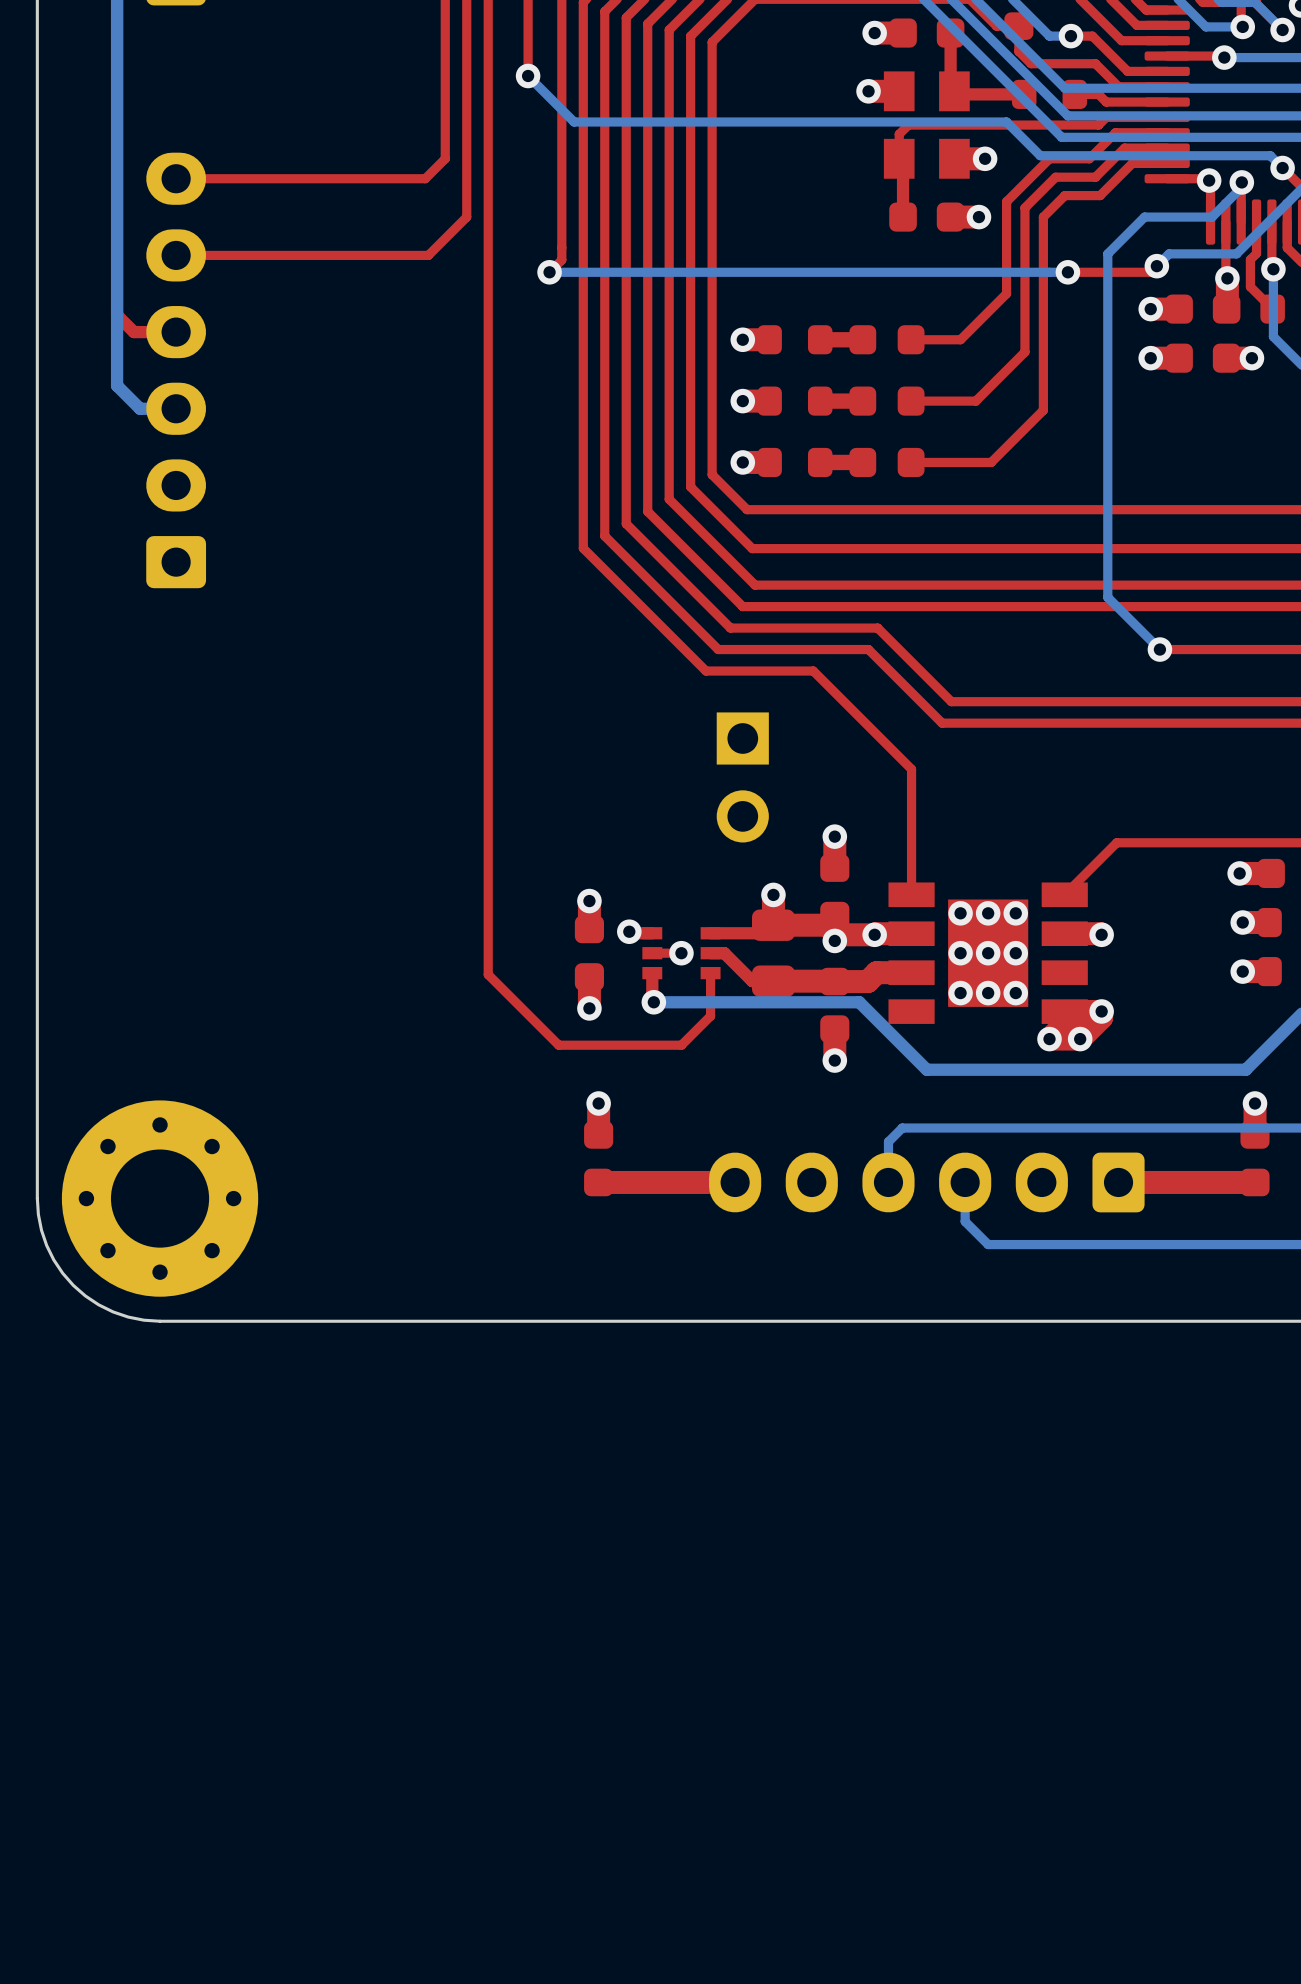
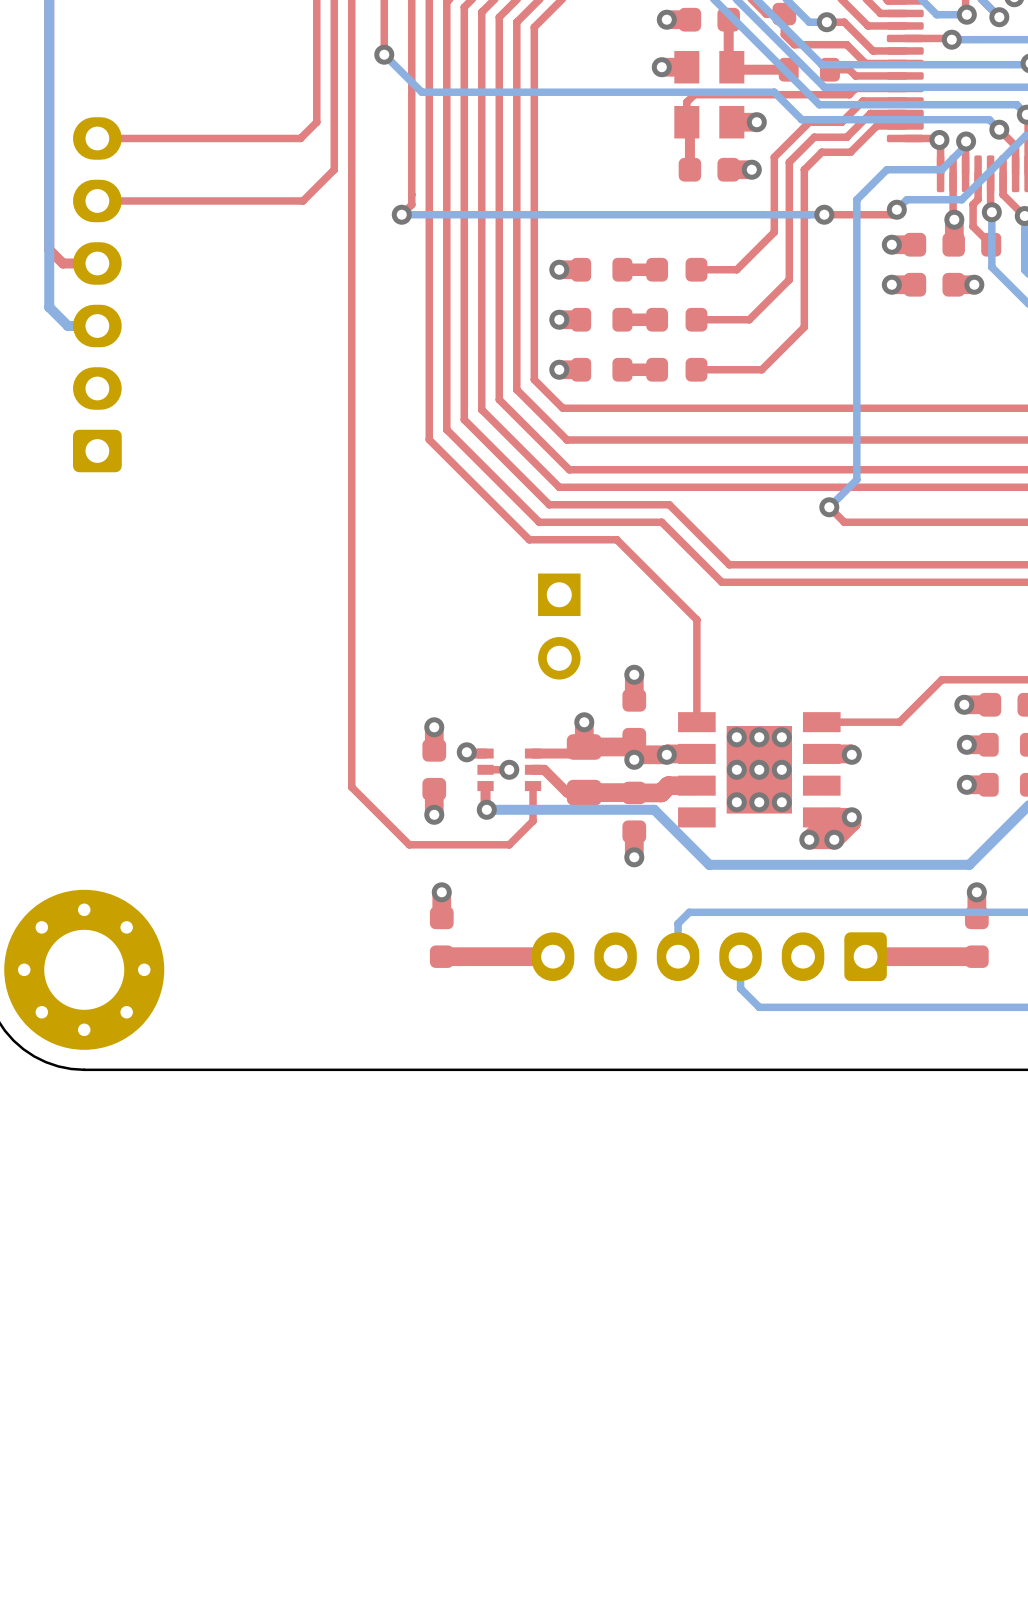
bottom track: (1107, 597) (1159, 649) -> (856, 479) (829, 507)
top track: none -> (829, 507) (844, 522) (899, 522)
via position: (1159, 649) -> (829, 507)
top track: (1212, 842) (1116, 842) (1064, 894) -> (941, 679) (899, 722) (821, 722)

